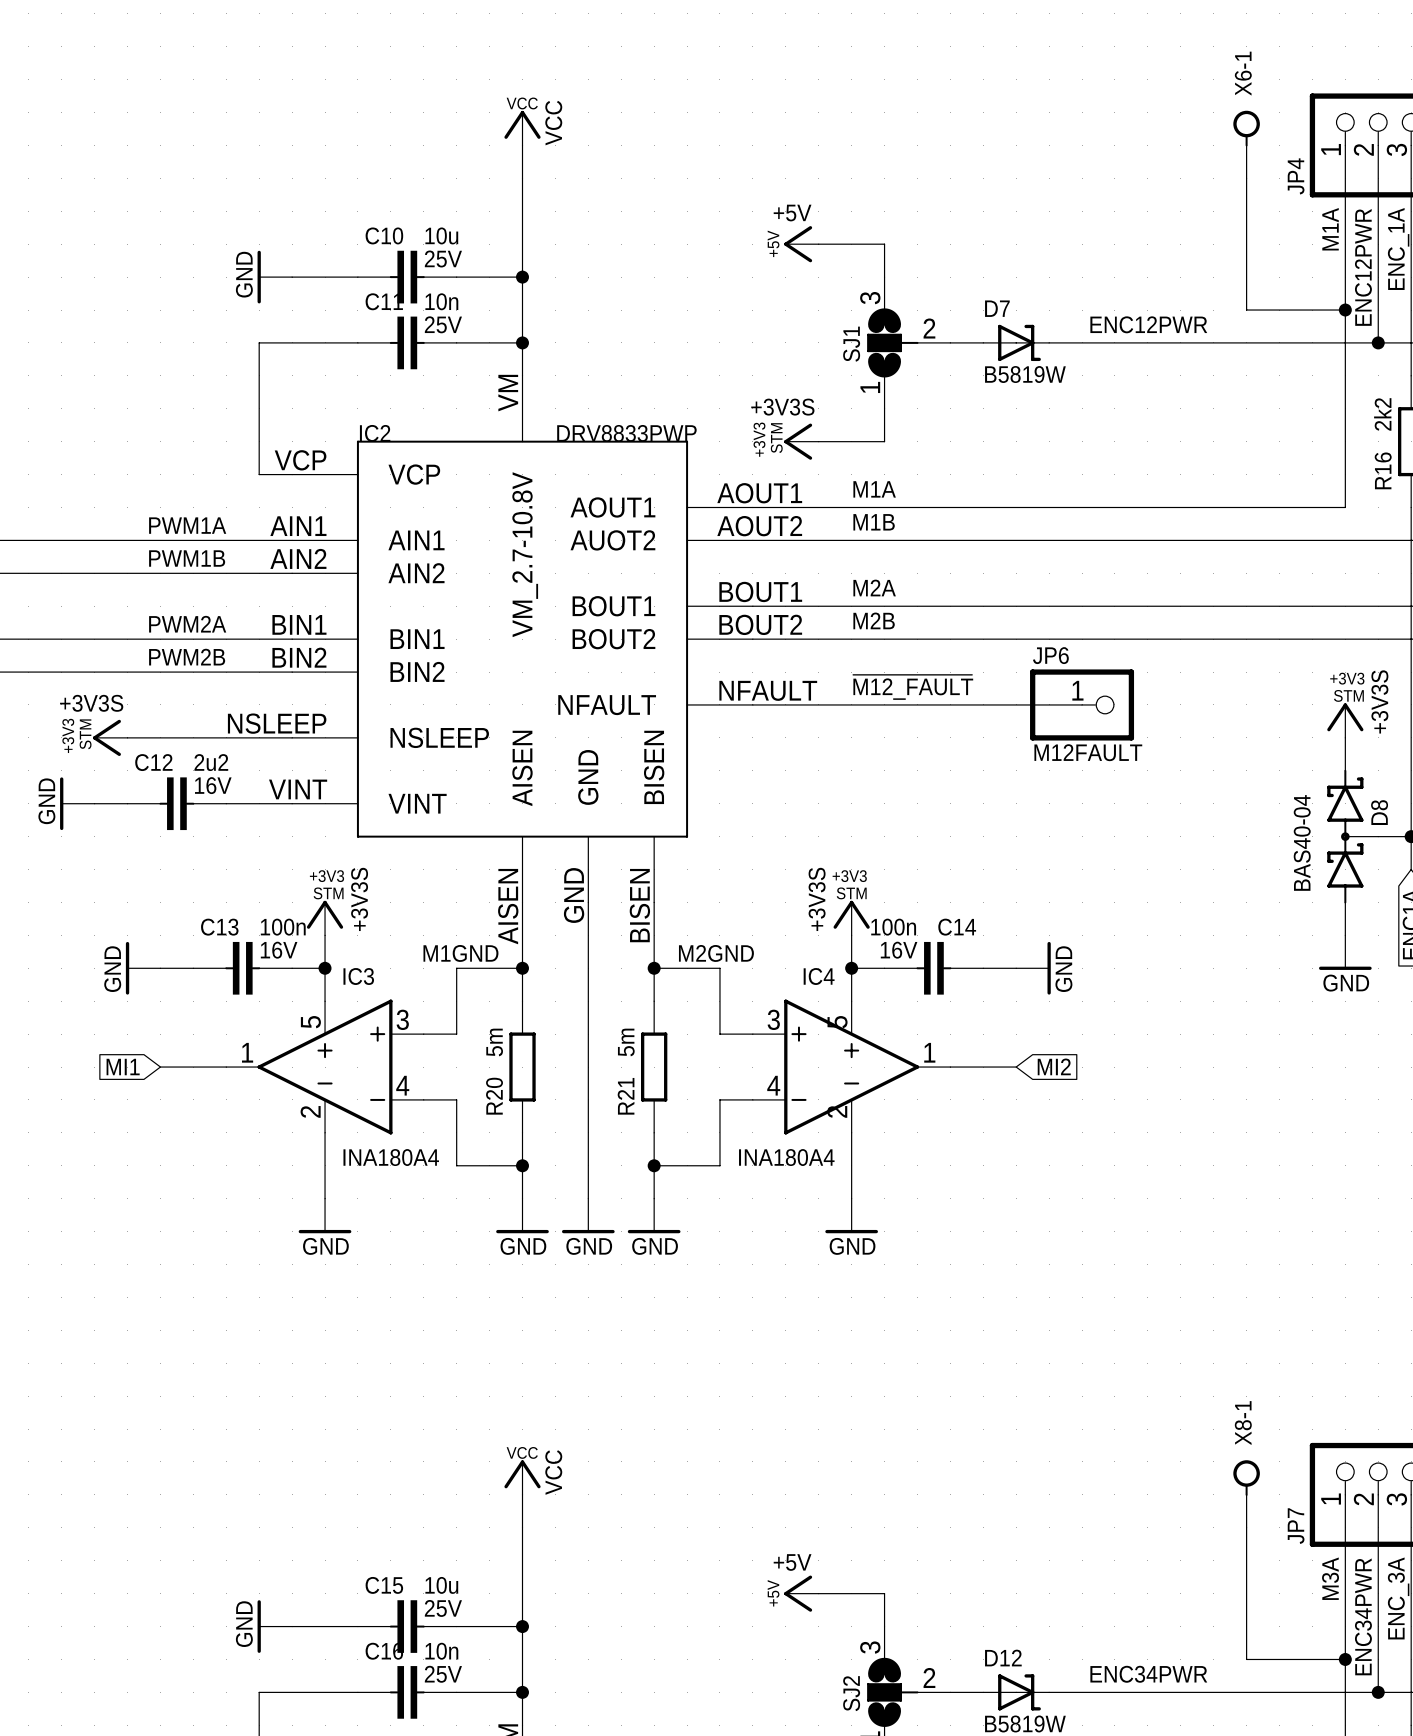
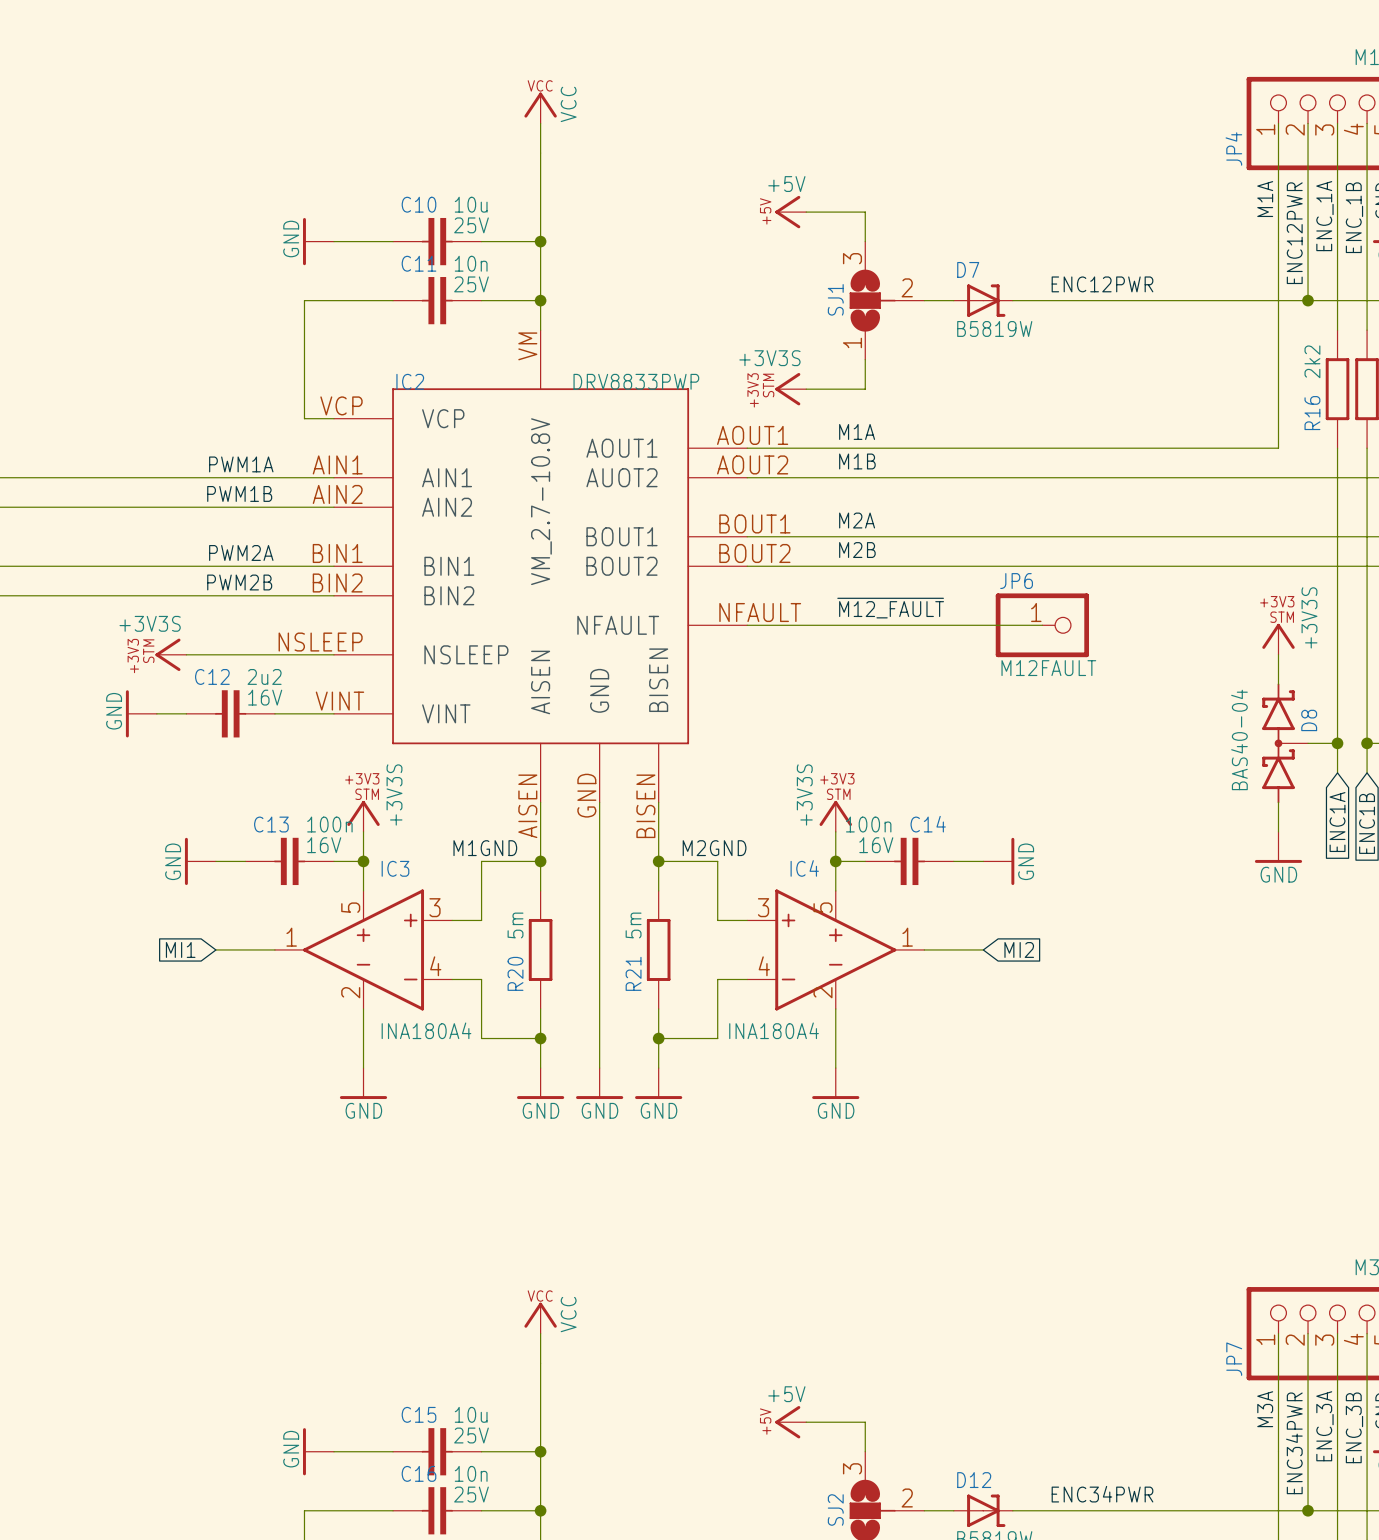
X6-1: (1246, 144) -> none
wire: (1246, 178) (1246, 310) (1345, 310) -> none
junction: (1345, 310) -> none
X8-1: (1246, 1494) -> none
wire: (1246, 1527) (1246, 1659) (1345, 1659) -> none
junction: (1345, 1659) -> none

